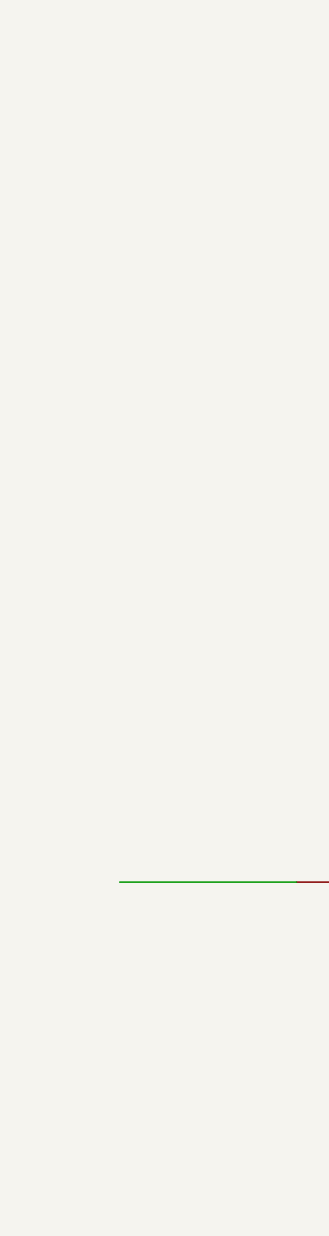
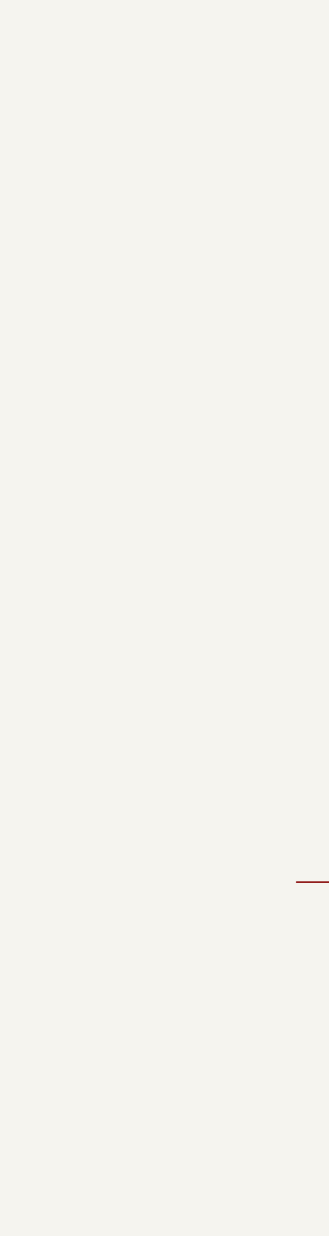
wire: (119, 882) (296, 882) -> none

